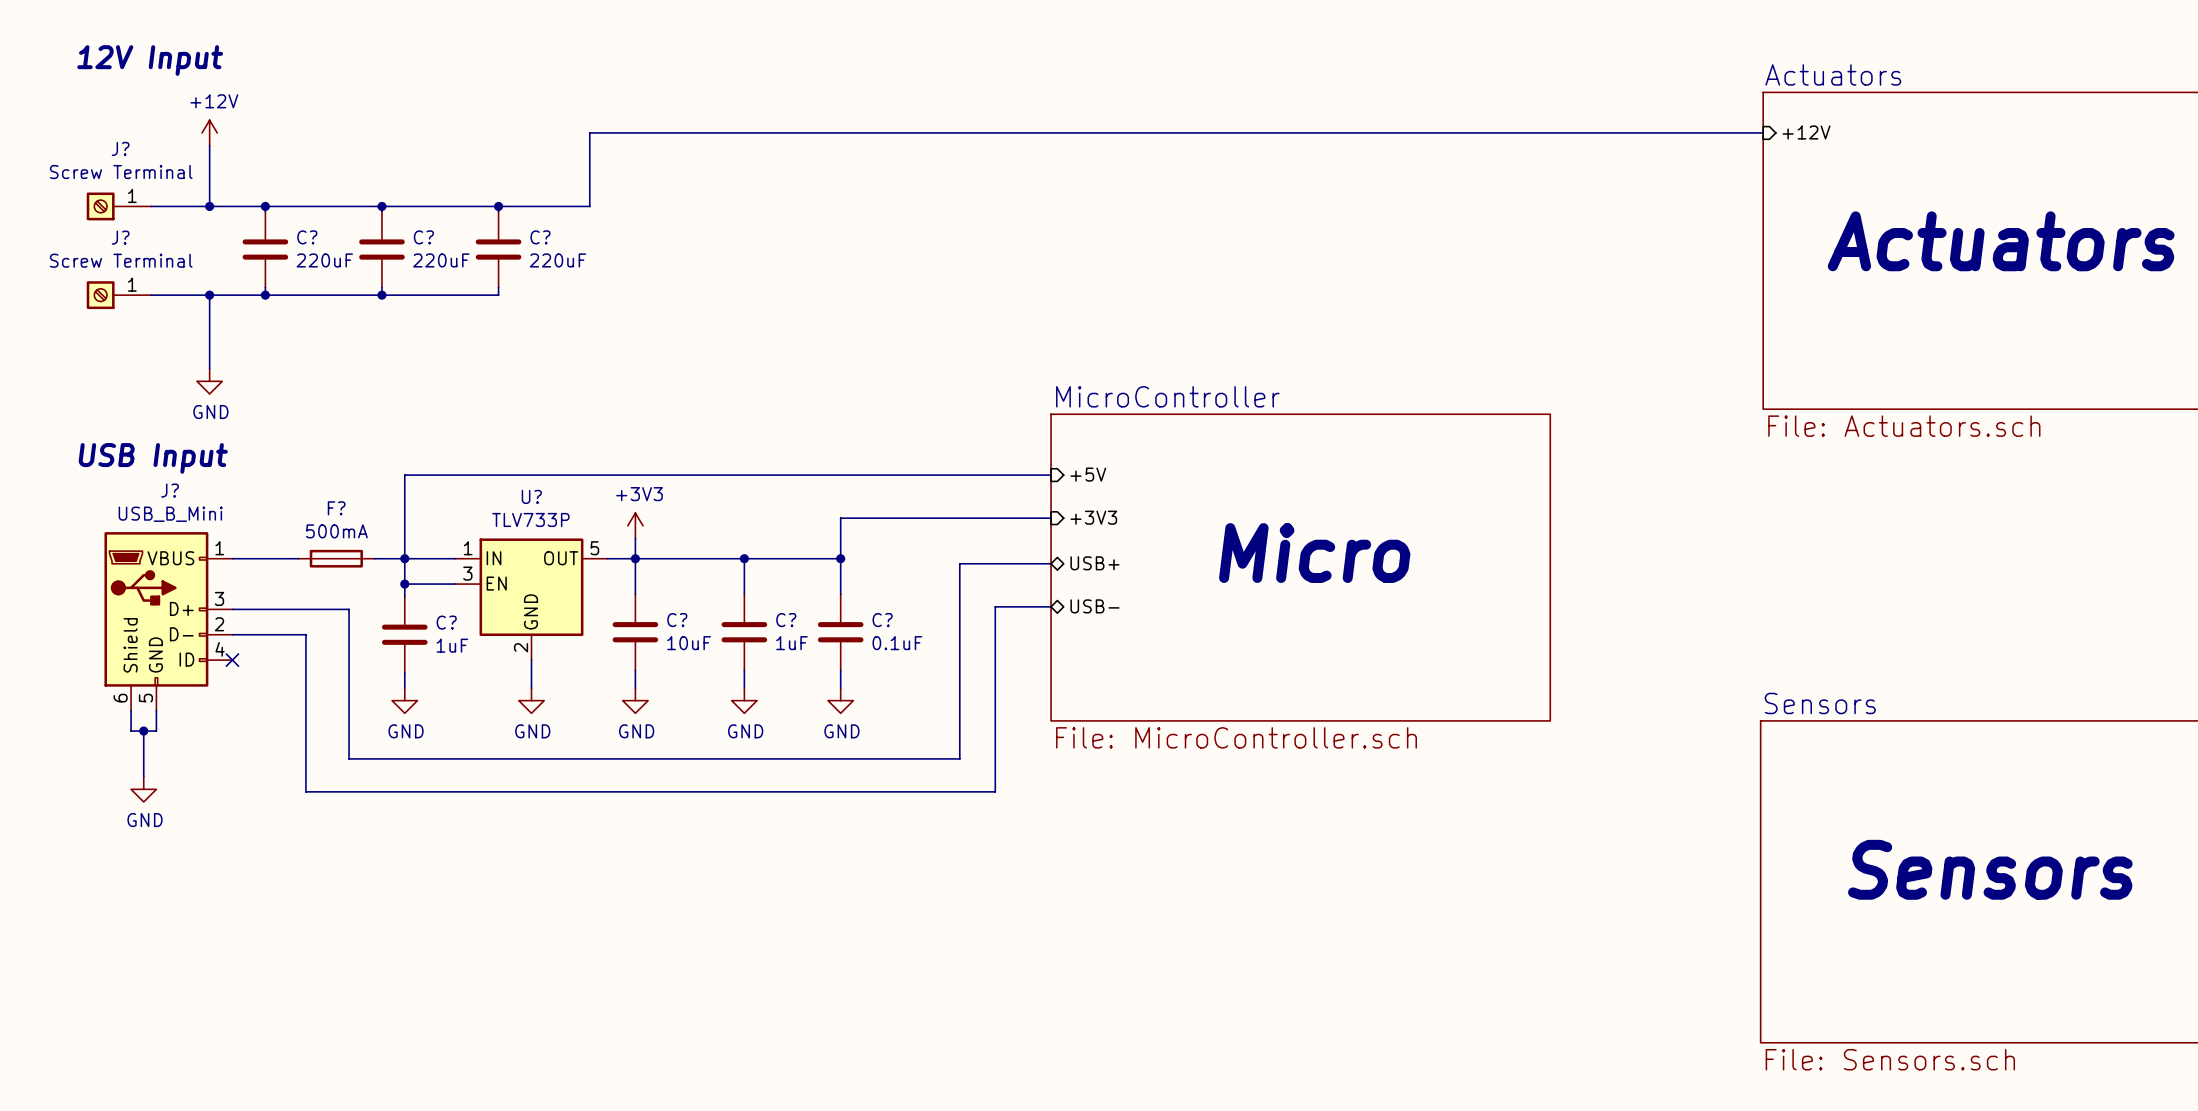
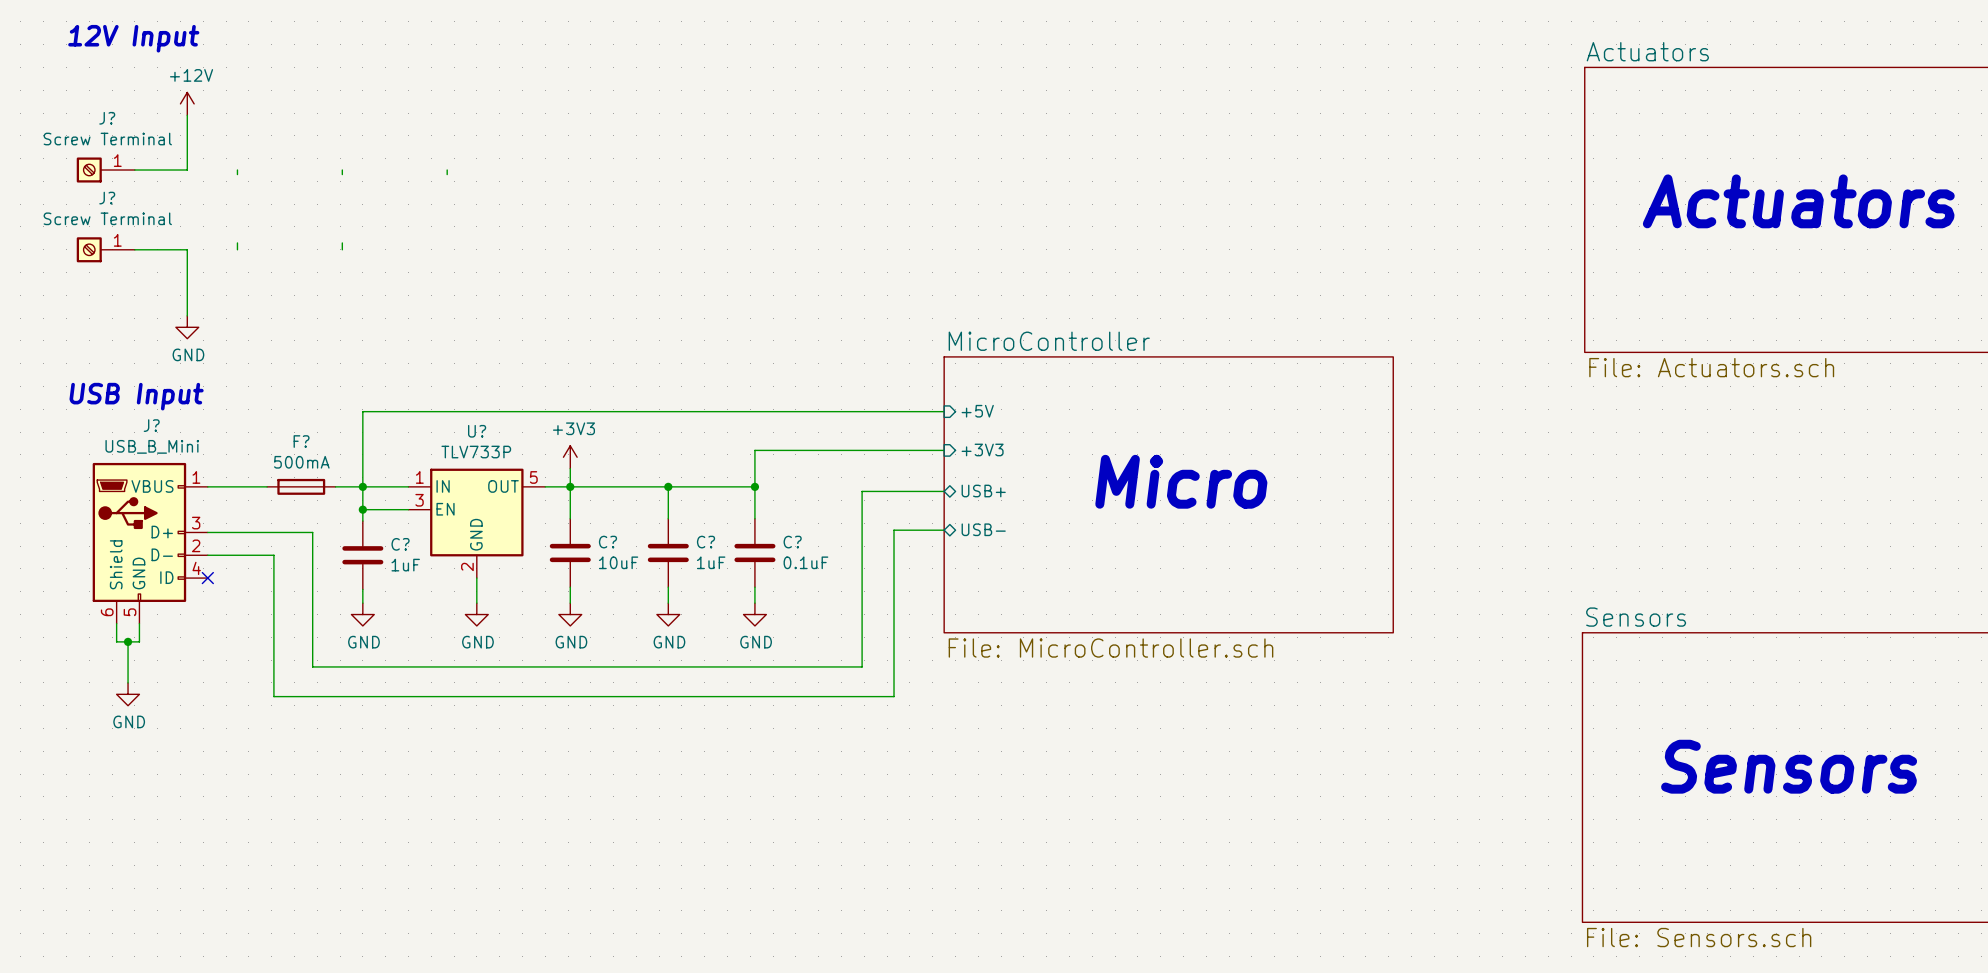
wire: (1763, 132) (589, 132) (589, 206) (209, 206) -> none
sheet pin: +12V (1806, 132) -> none
junction: (209, 206) -> none
junction: (265, 206) -> none
junction: (381, 206) -> none
junction: (498, 206) -> none
C?: 220uF (265, 249) -> none
C?: 220uF (381, 249) -> none
C?: 220uF (498, 249) -> none
wire: (498, 287) (498, 295) (209, 295) -> none
junction: (209, 295) -> none
junction: (265, 295) -> none
junction: (381, 295) -> none

